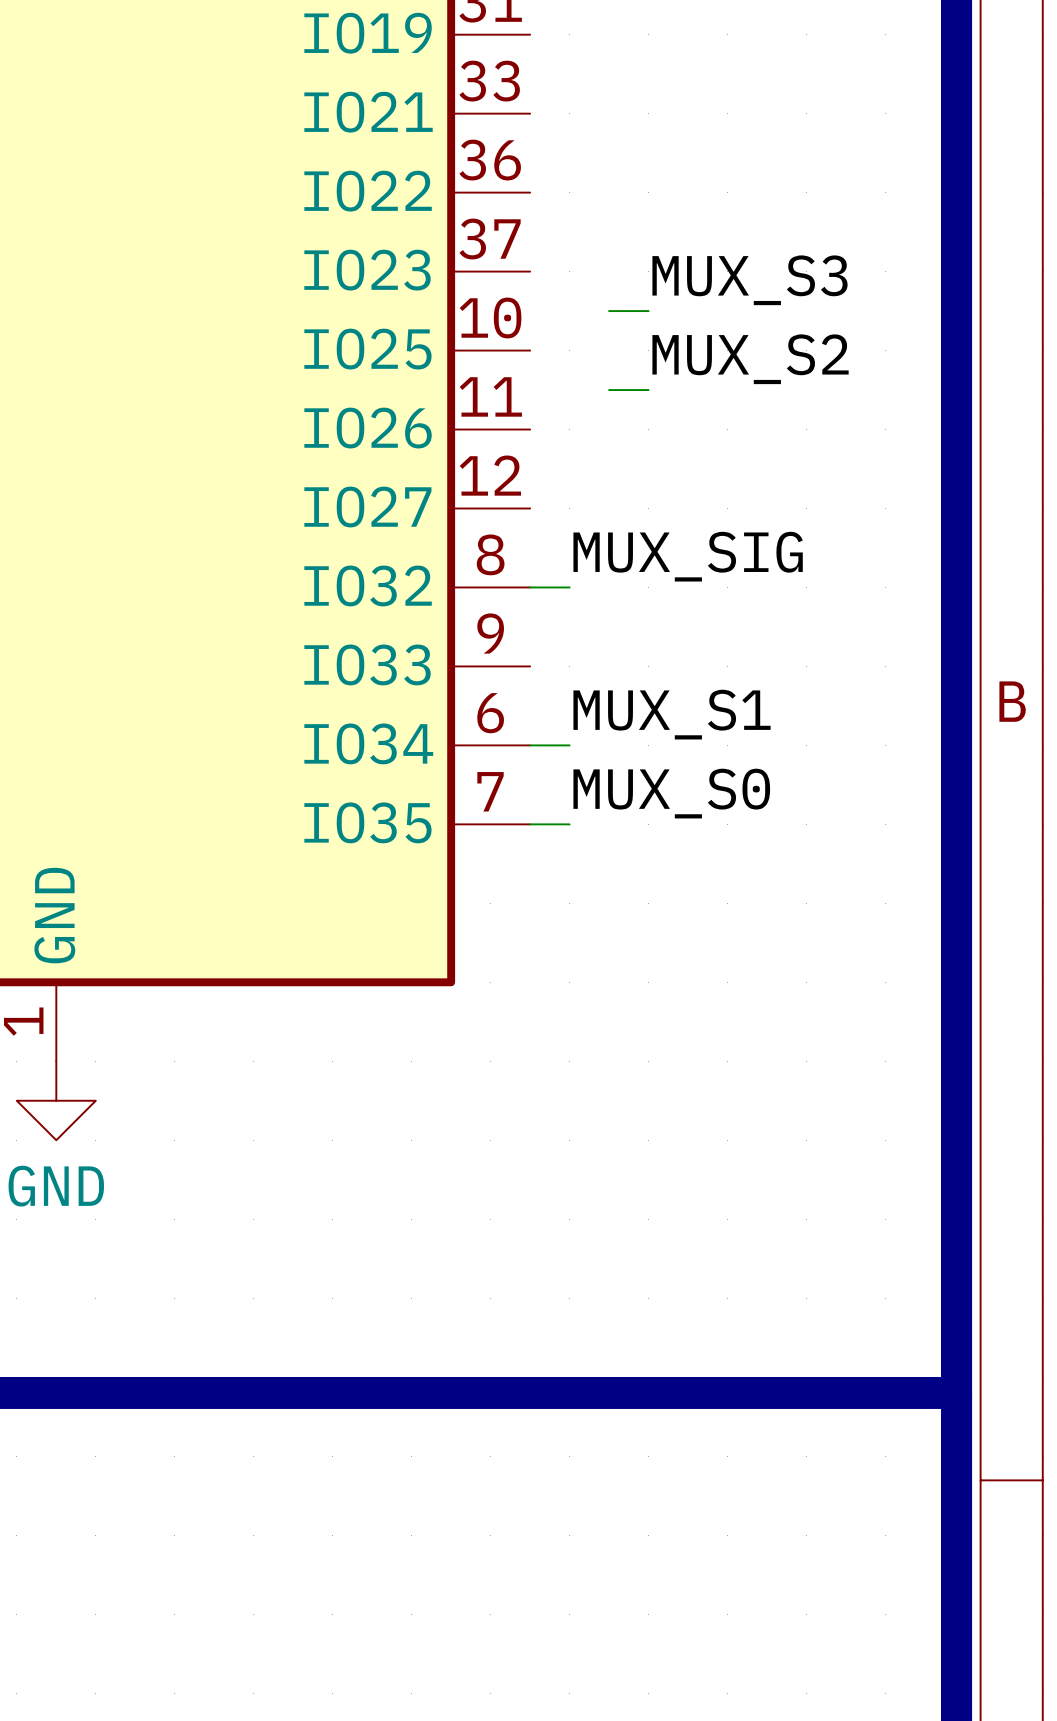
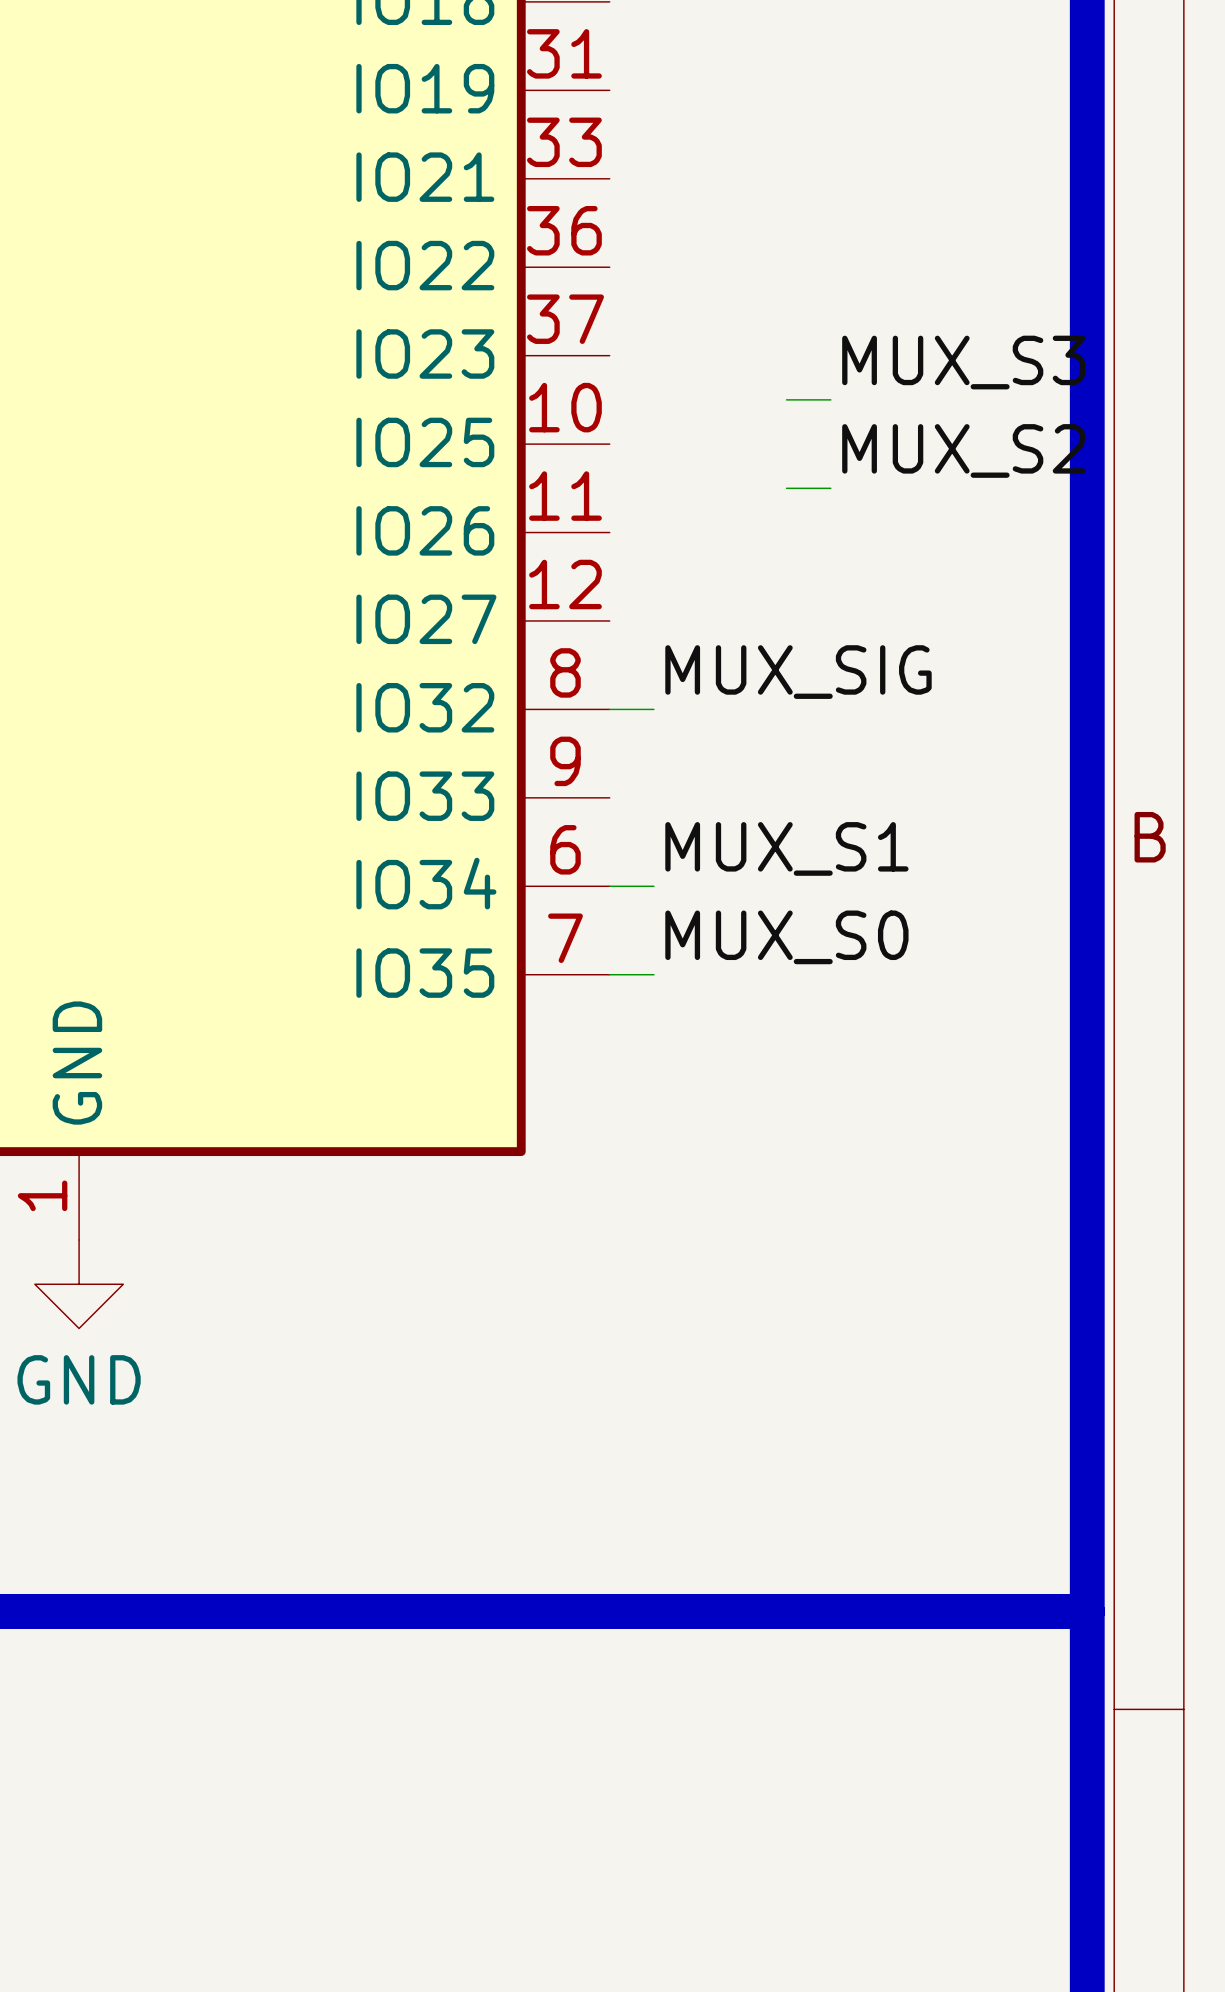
label position: MUX_S3 (750, 280) -> MUX_S3 (963, 362)
wire: (609, 311) (648, 311) -> (786, 399) (830, 399)
label position: MUX_S2 (750, 359) -> MUX_S2 (963, 450)
wire: (609, 390) (648, 390) -> (786, 488) (830, 488)

